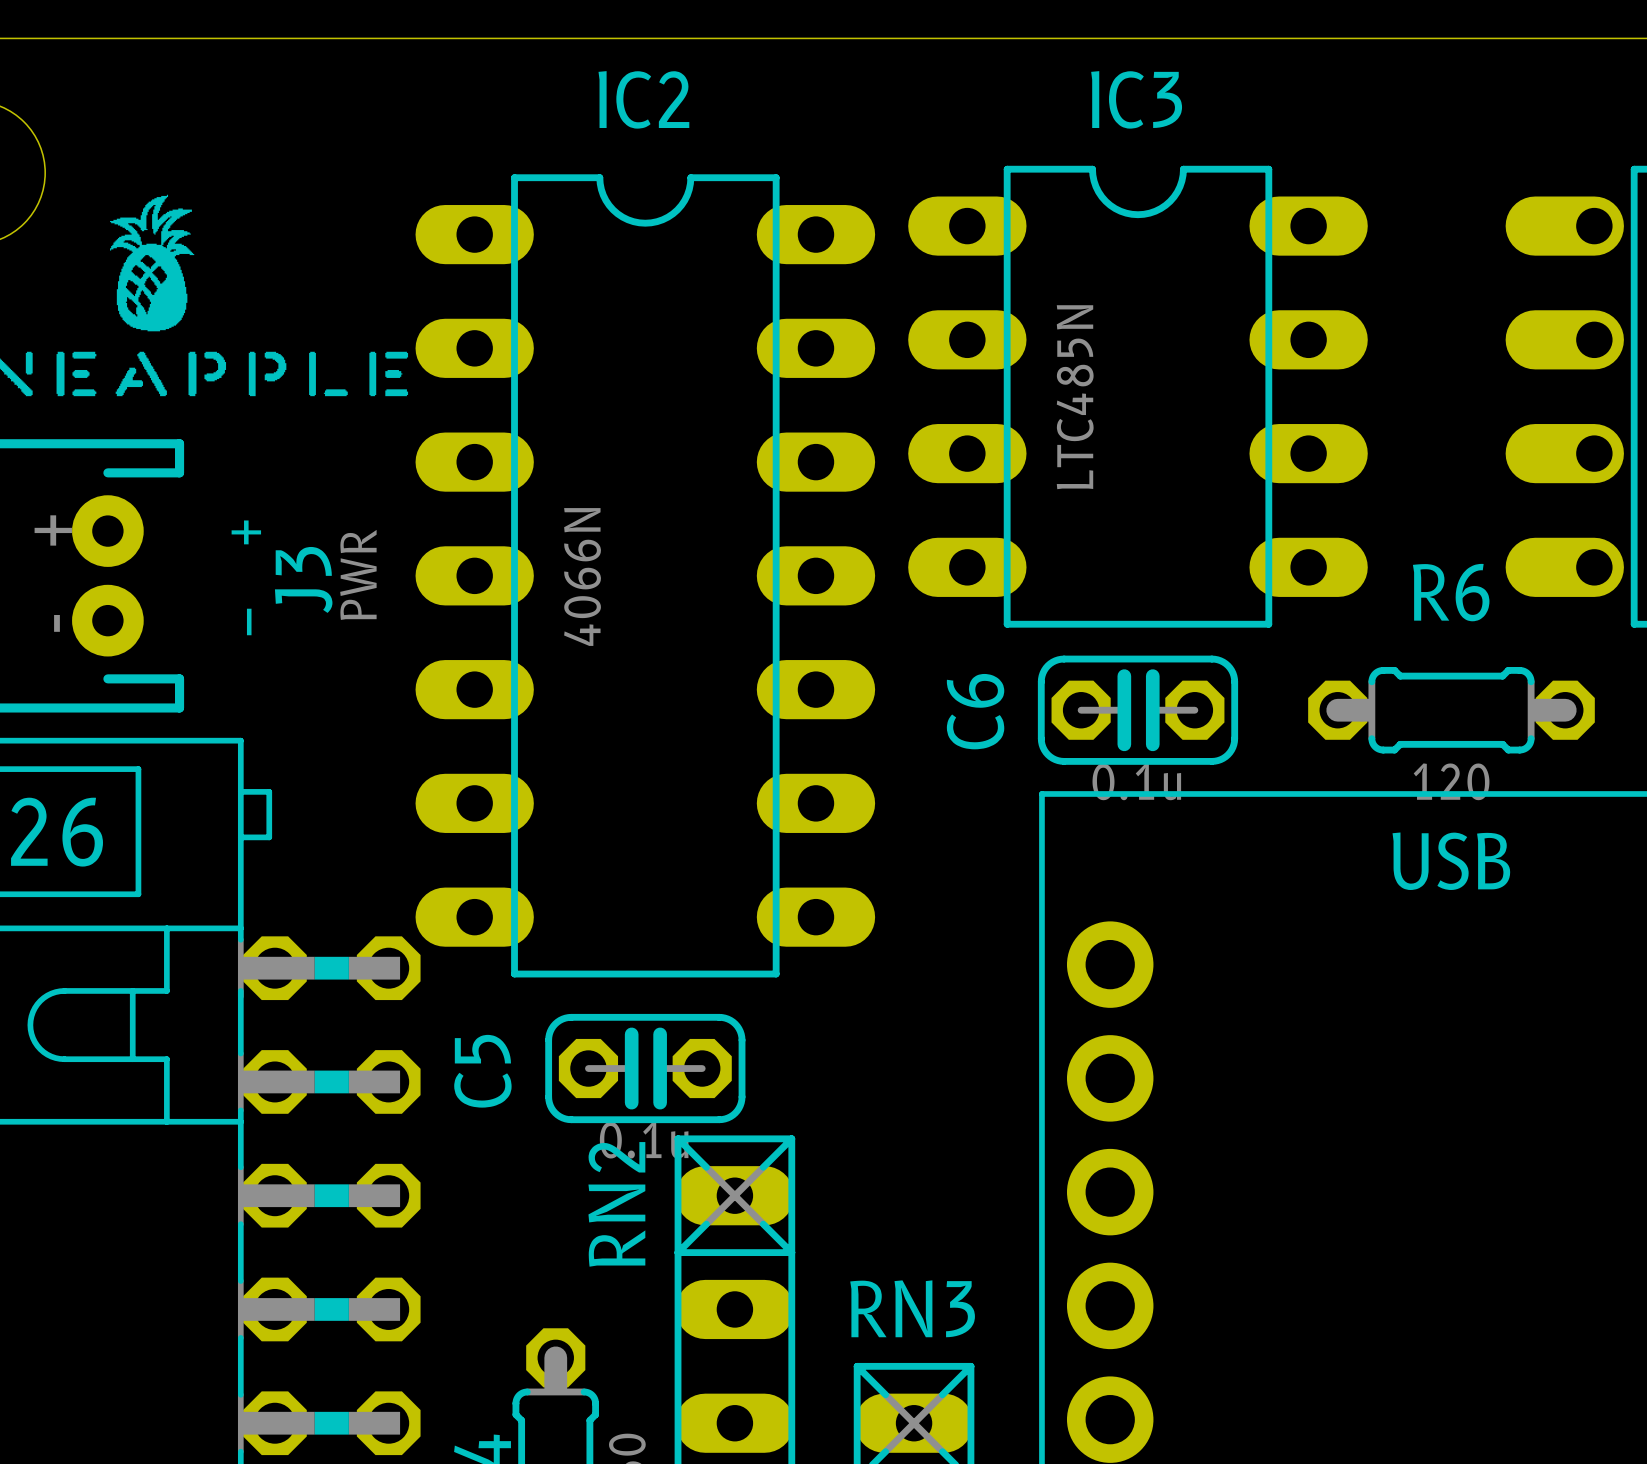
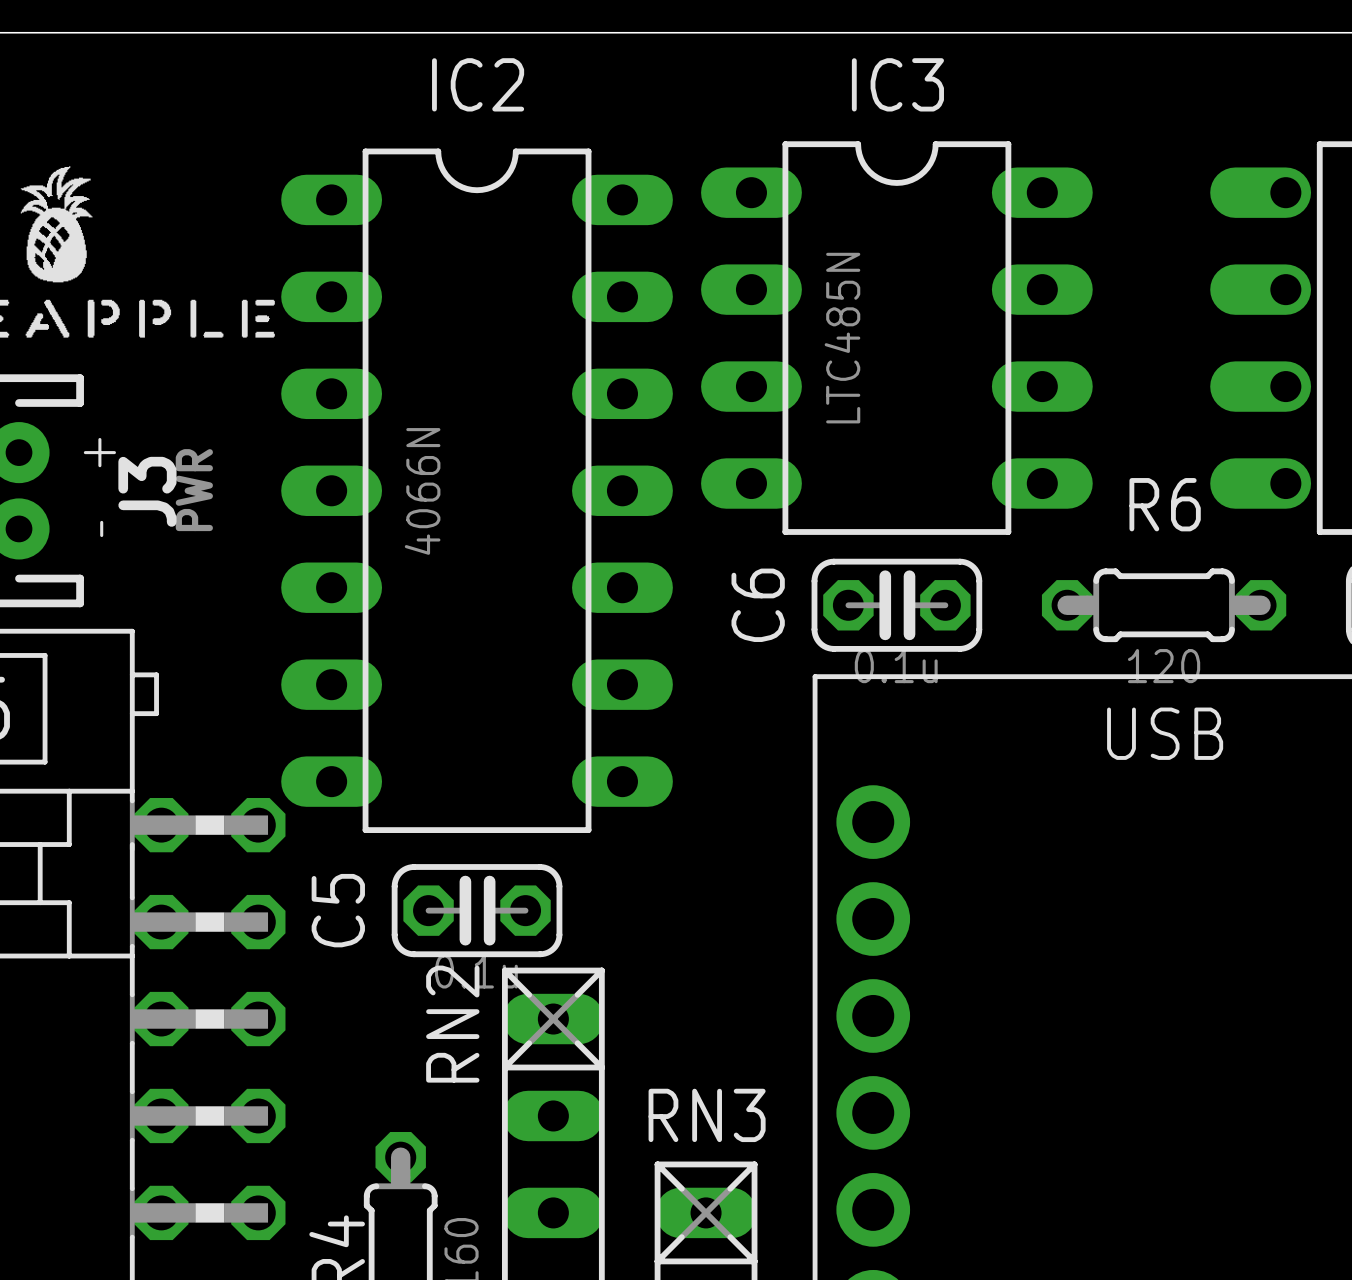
text position: + (246, 532) -> + (99, 452)
J3 value position: PWR (358, 574) -> PWR (194, 490)
J3 name position: J3 (303, 579) -> J3 (147, 491)
text position: – (249, 621) -> – (101, 528)

